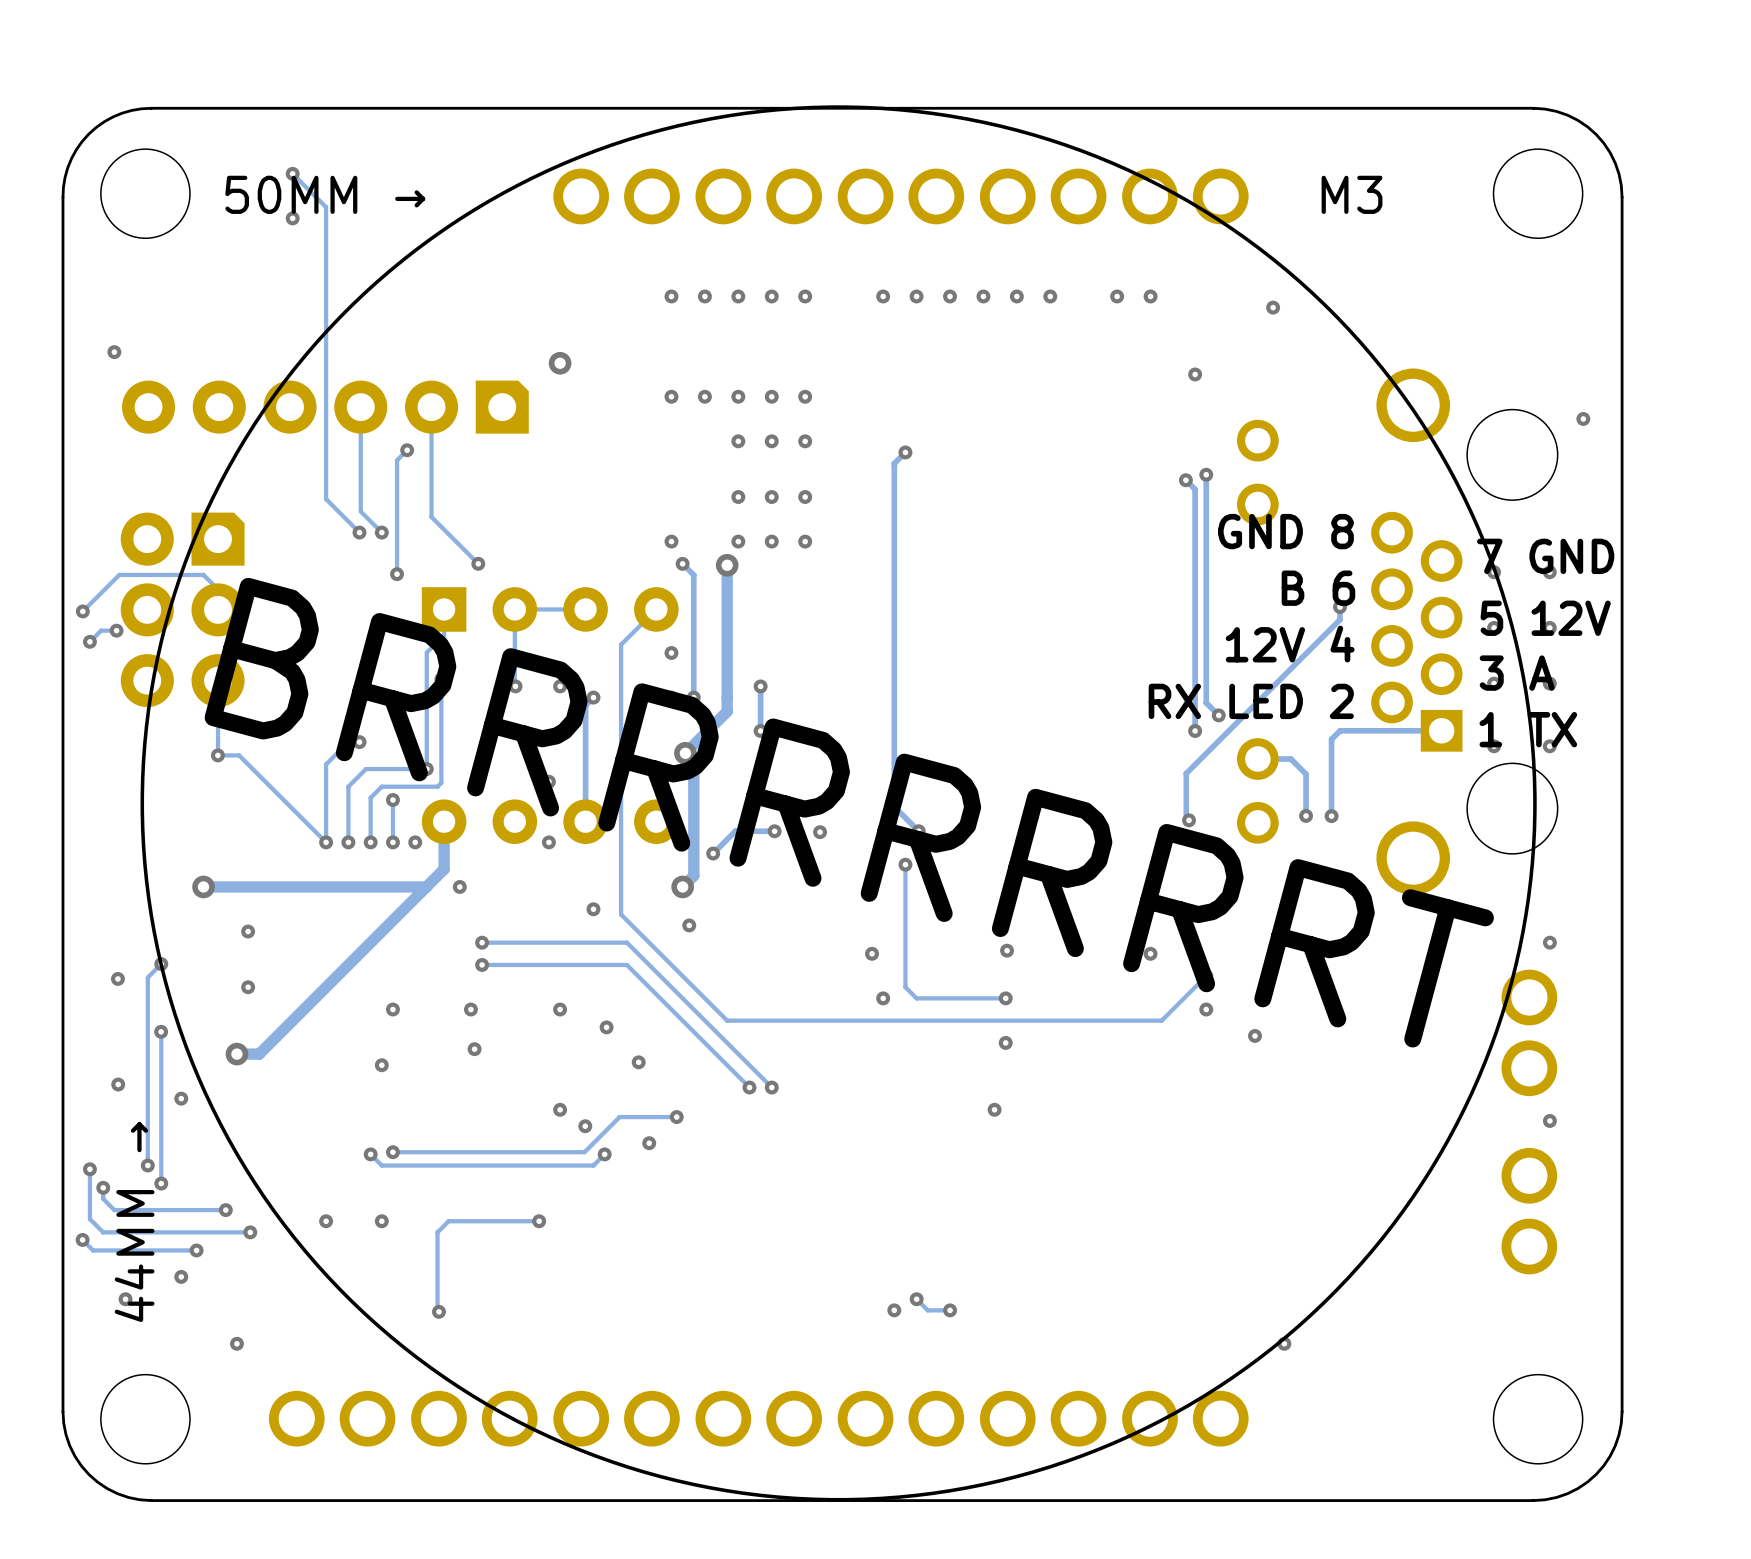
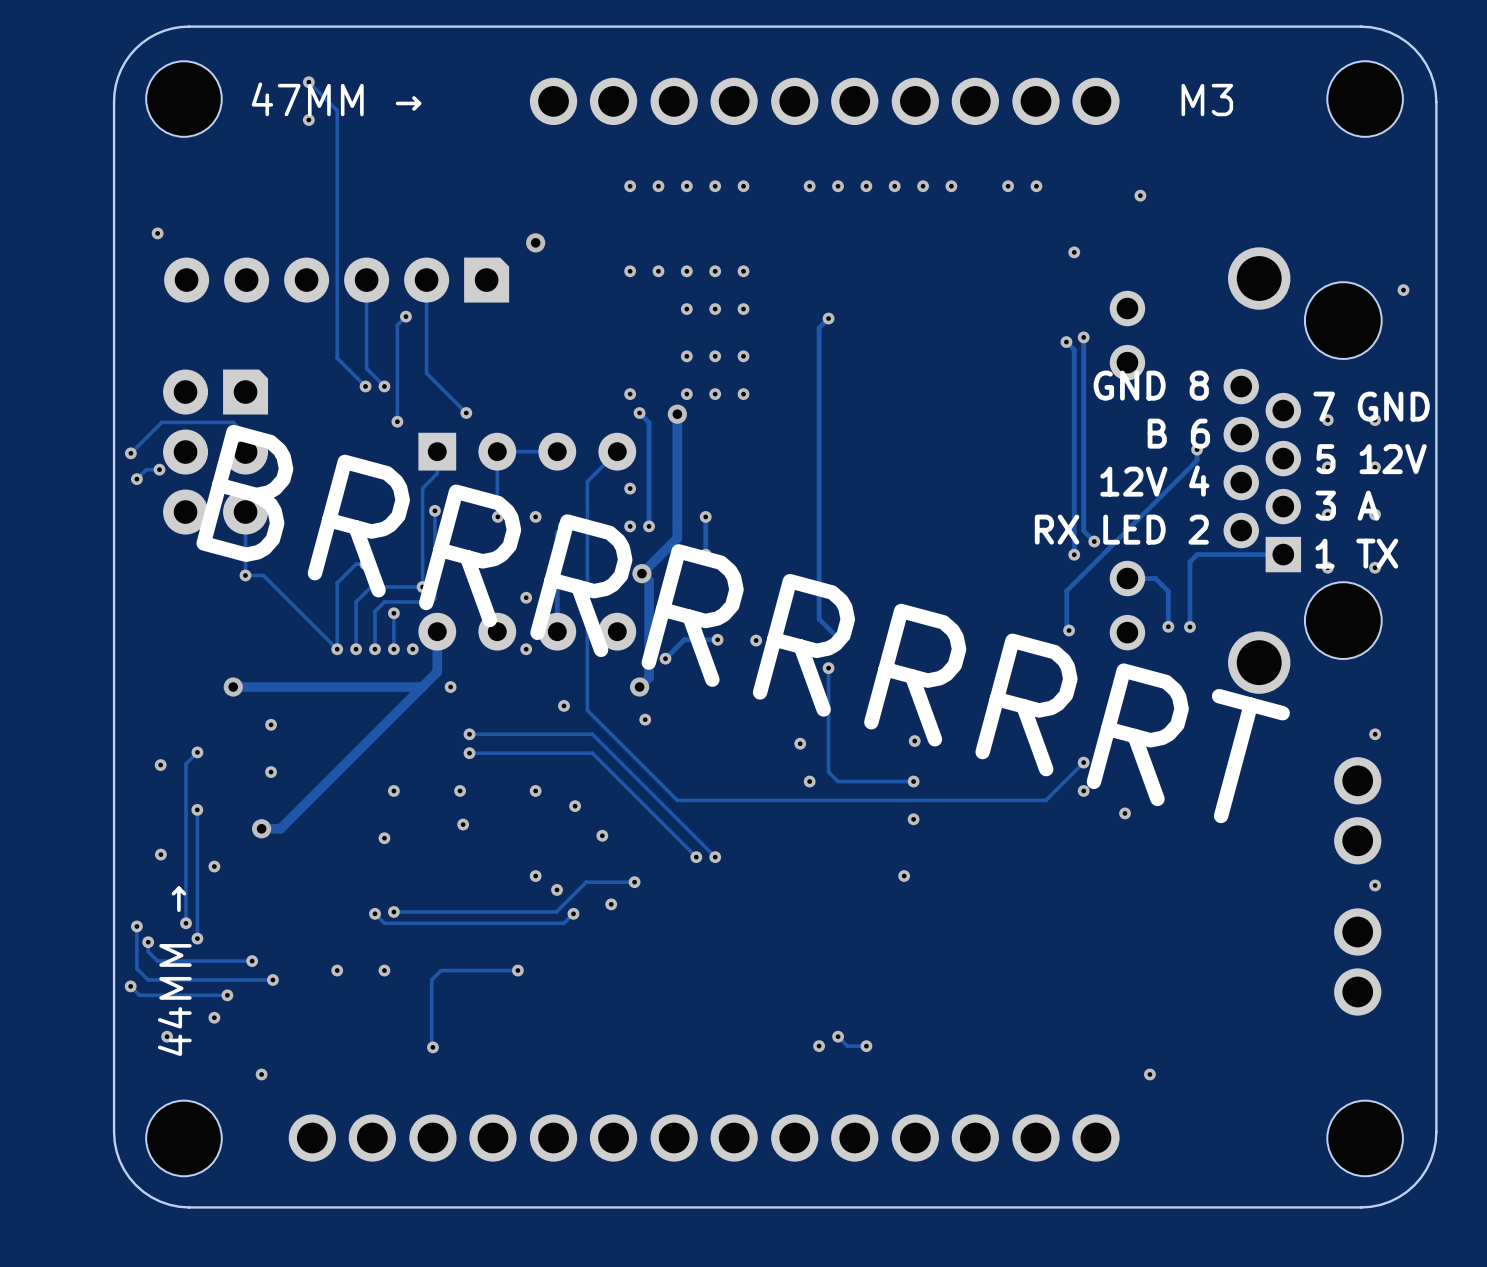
drawing: [140, 105, 1537, 1502] -> none
text: 50MM → (325, 194) -> 47MM → (336, 99)
text position: BRRRRRRRRT (849, 812) -> BRRRRRRRRT (743, 624)

